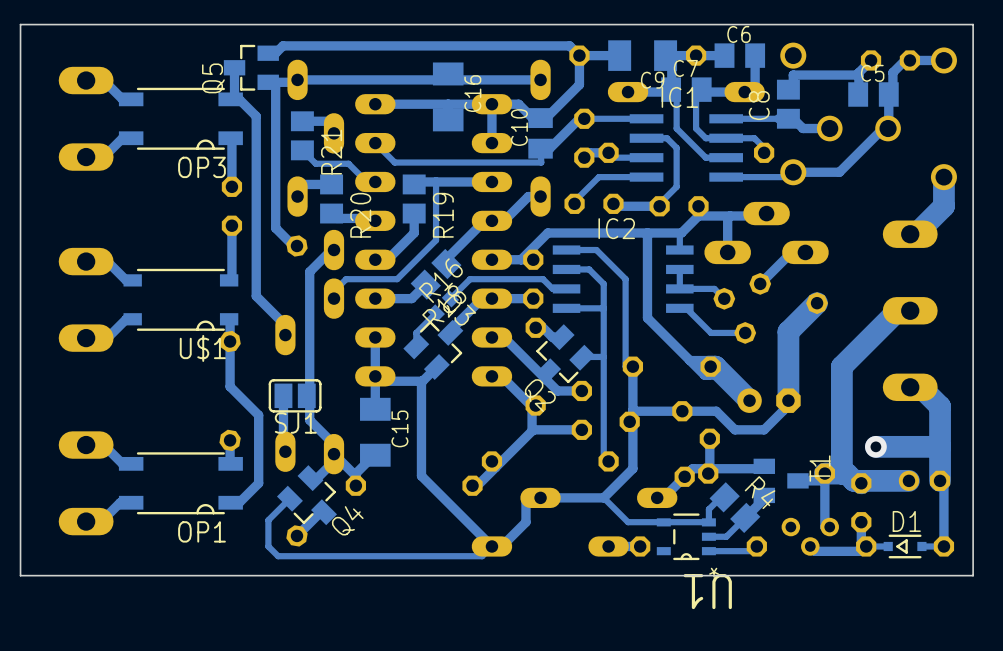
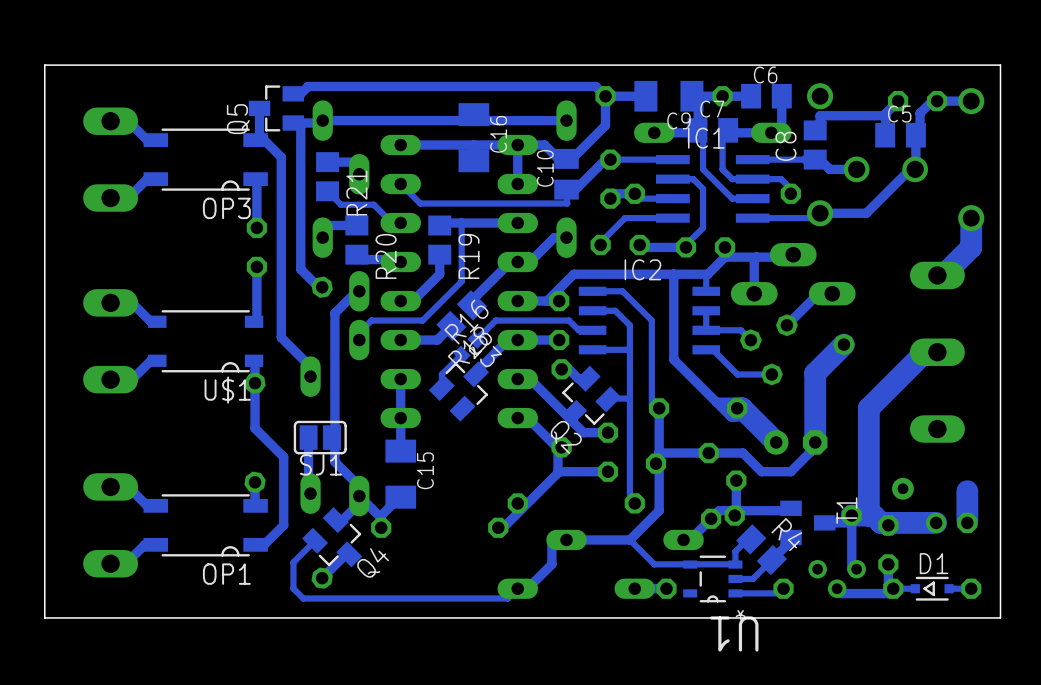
track: (436, 366) (422, 381) (375, 381) -> none
track: (421, 381) (421, 476) (491, 546) -> none
track: (910, 387) (920, 387) (940, 406) (940, 449) -> none
track: (940, 446) (875, 446) -> none
track: (940, 478) (940, 480) (943, 480) (943, 546) -> none

